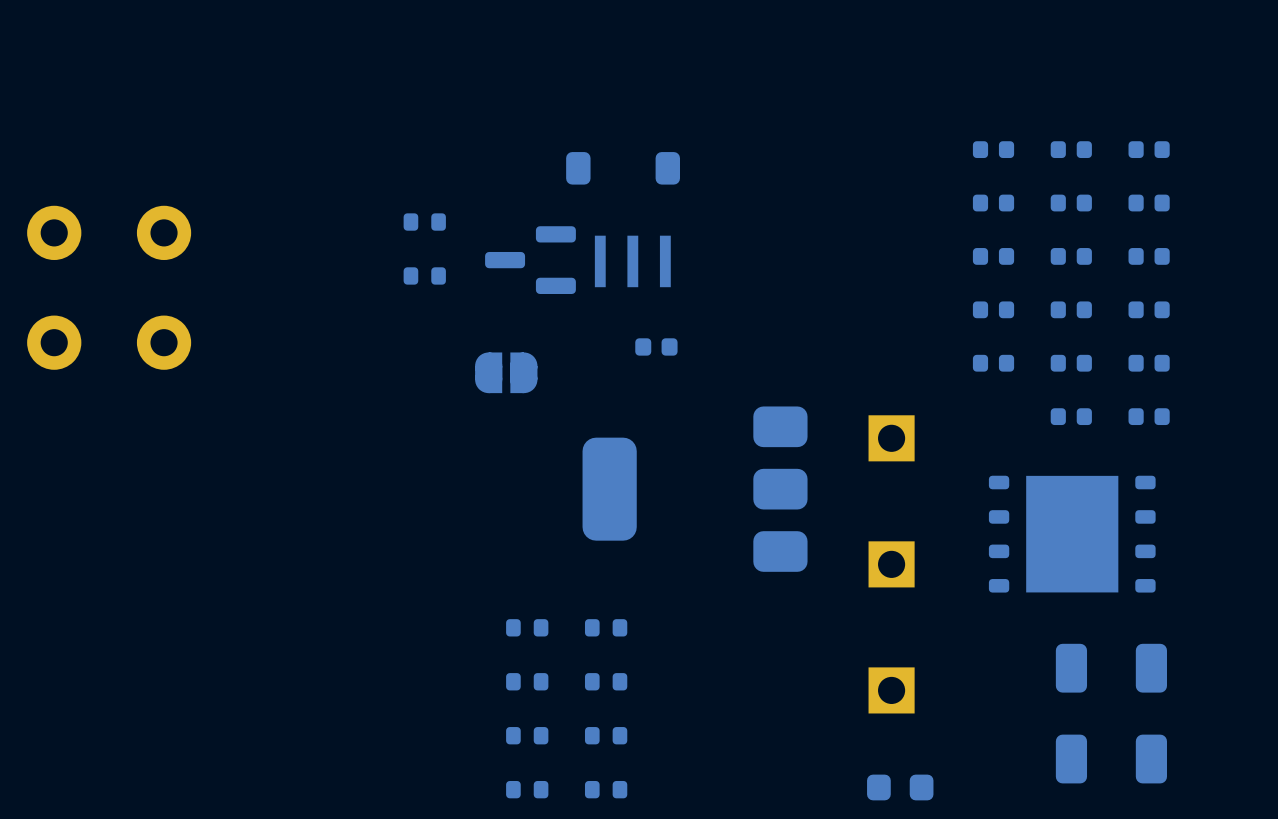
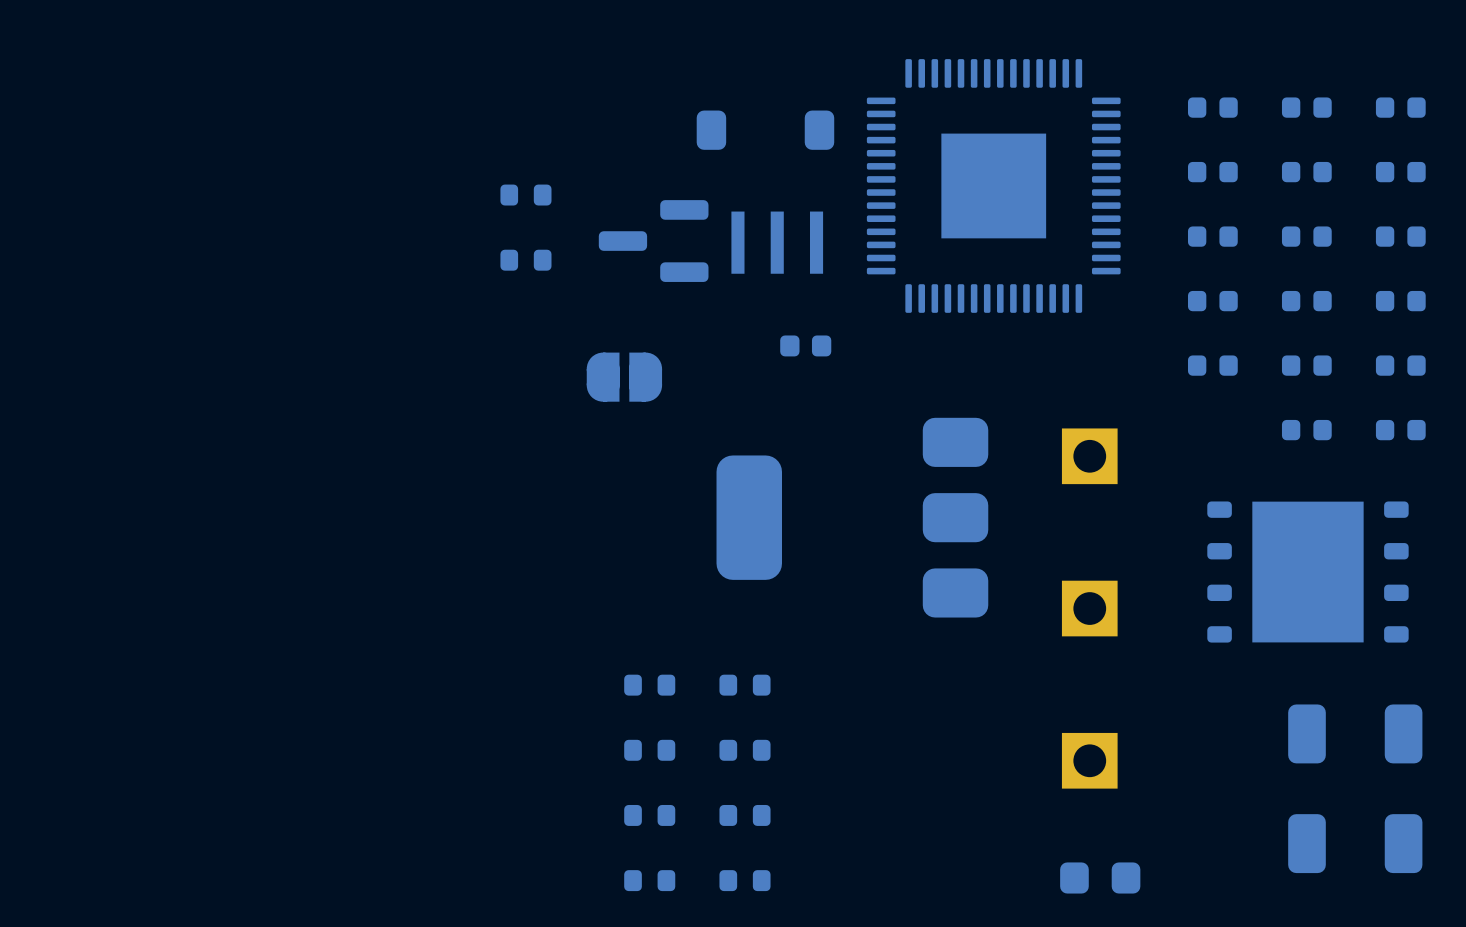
part: none -> (993, 185)
part: (54, 232) -> none
part: (164, 232) -> none
part: (54, 342) -> none
part: (164, 342) -> none

